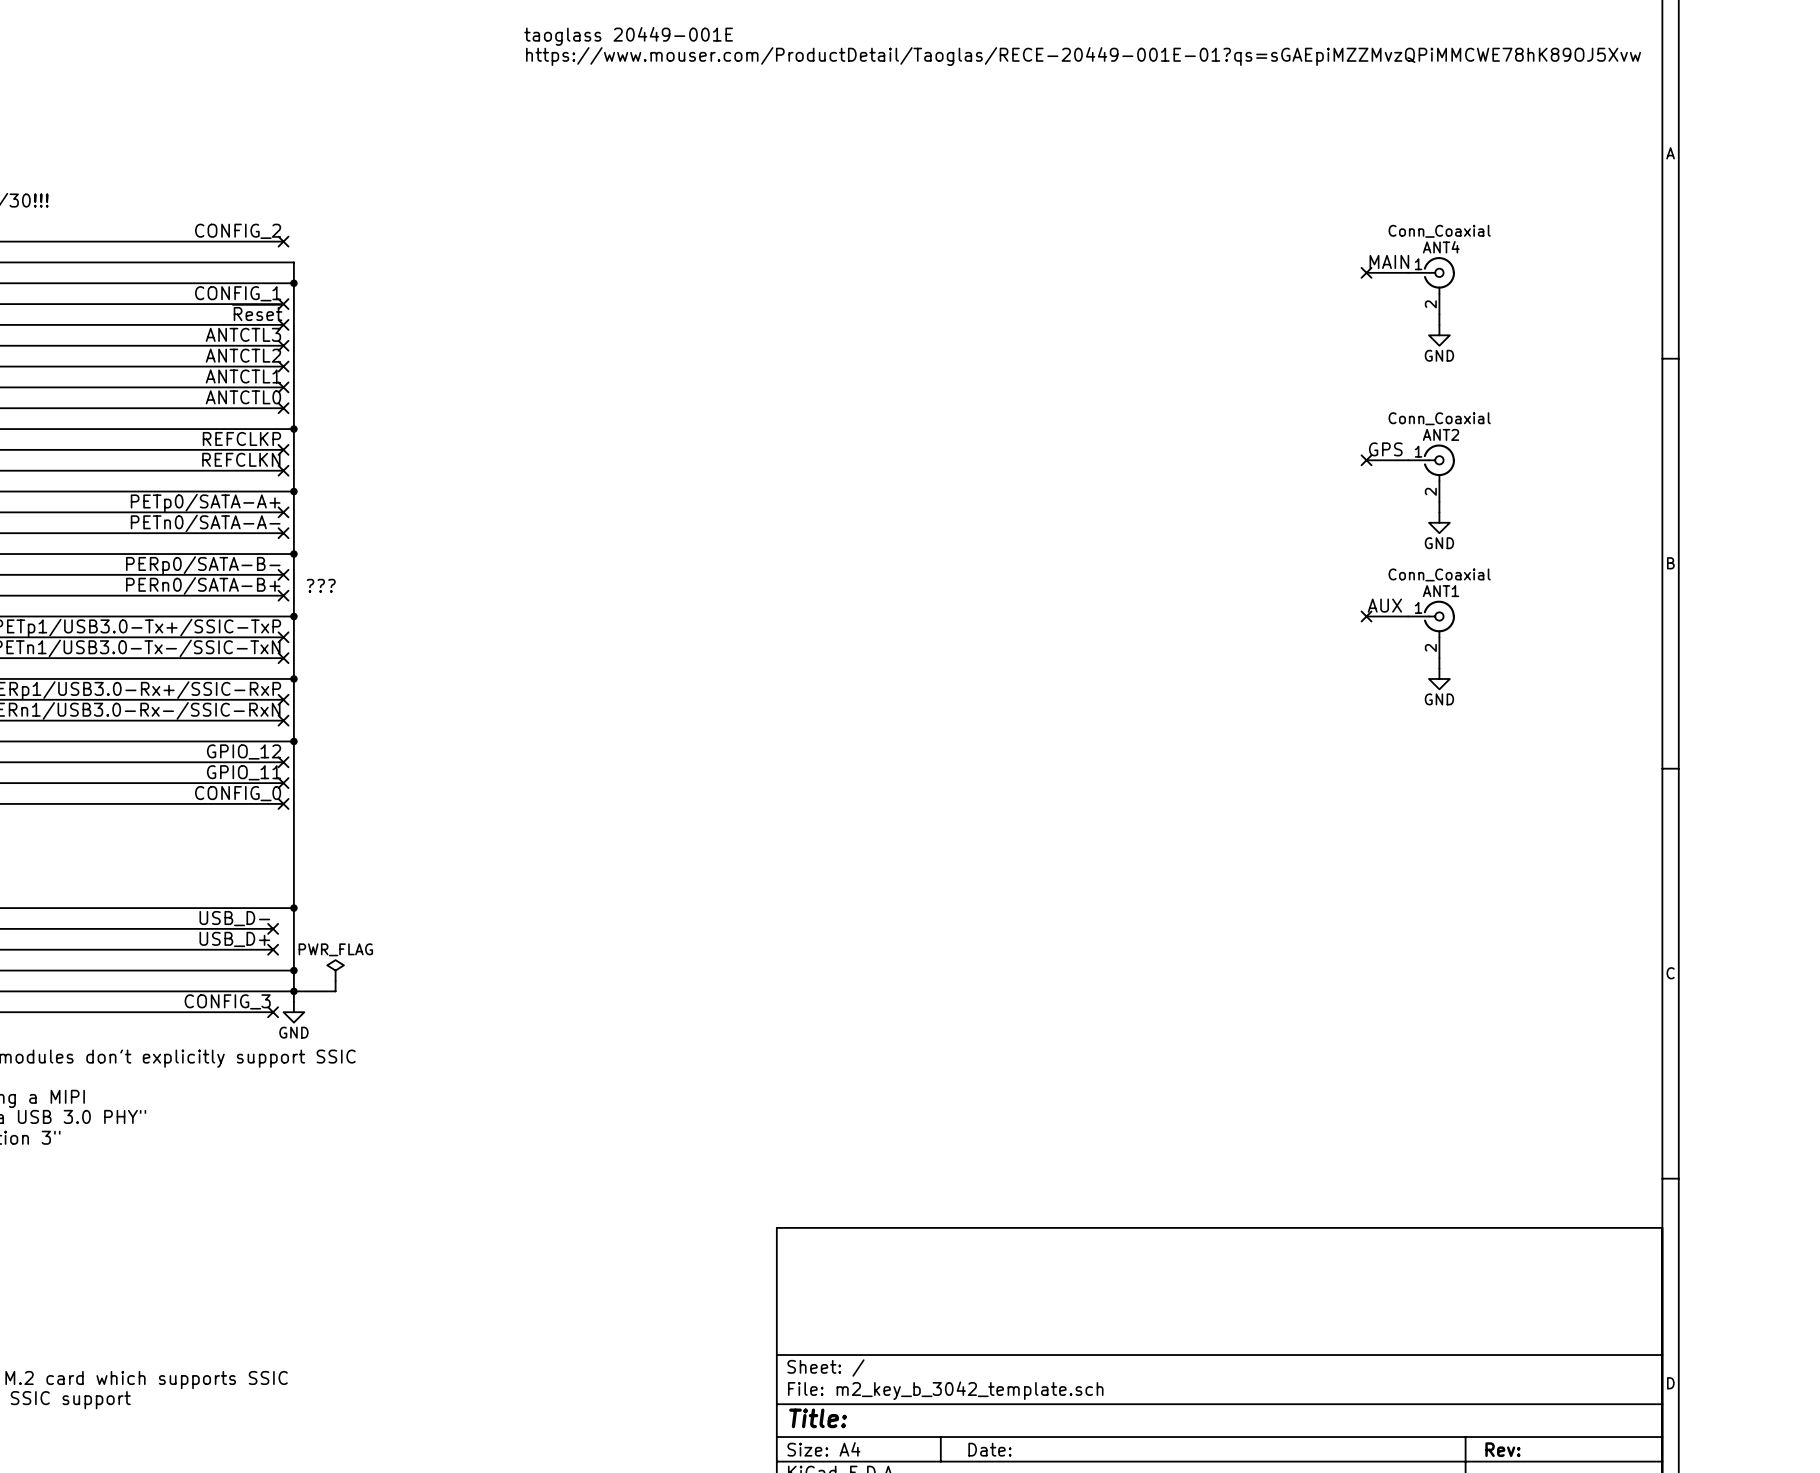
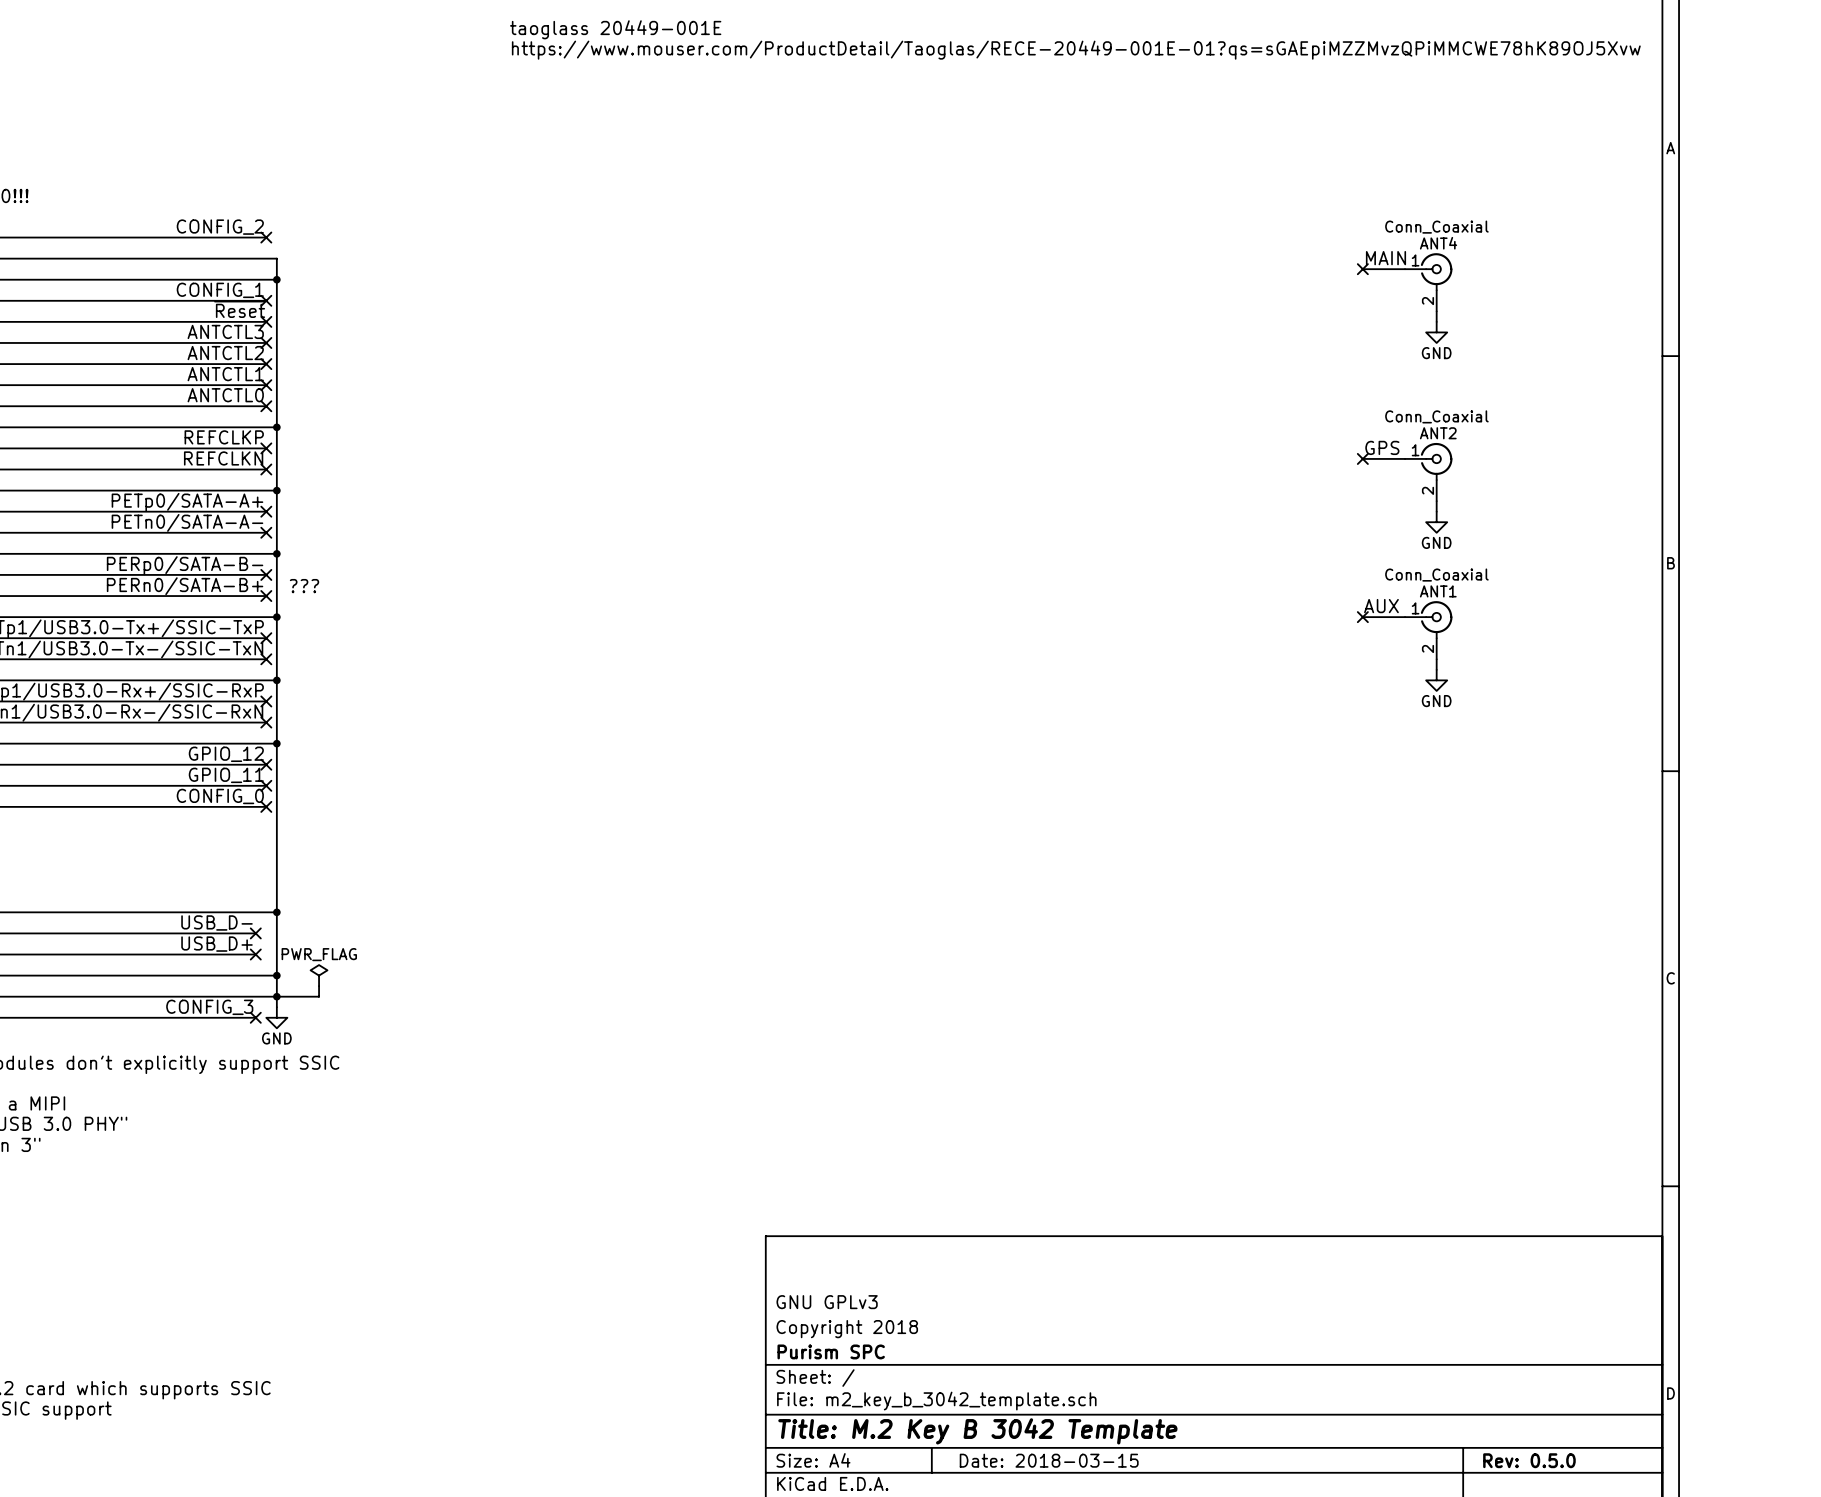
title block: none -> GNU GPLv3 (827, 1302)
title block: none -> Copyright 2018 (847, 1329)
title block: none -> Purism SPC (831, 1351)
title block: Title: (818, 1418) -> Title: M.2 Key B 3042 Template (977, 1431)
title block: Date: (989, 1449) -> Date: 2018-03-15 (1049, 1460)
title block: Rev: (1502, 1449) -> Rev: 0.5.0 (1529, 1460)

